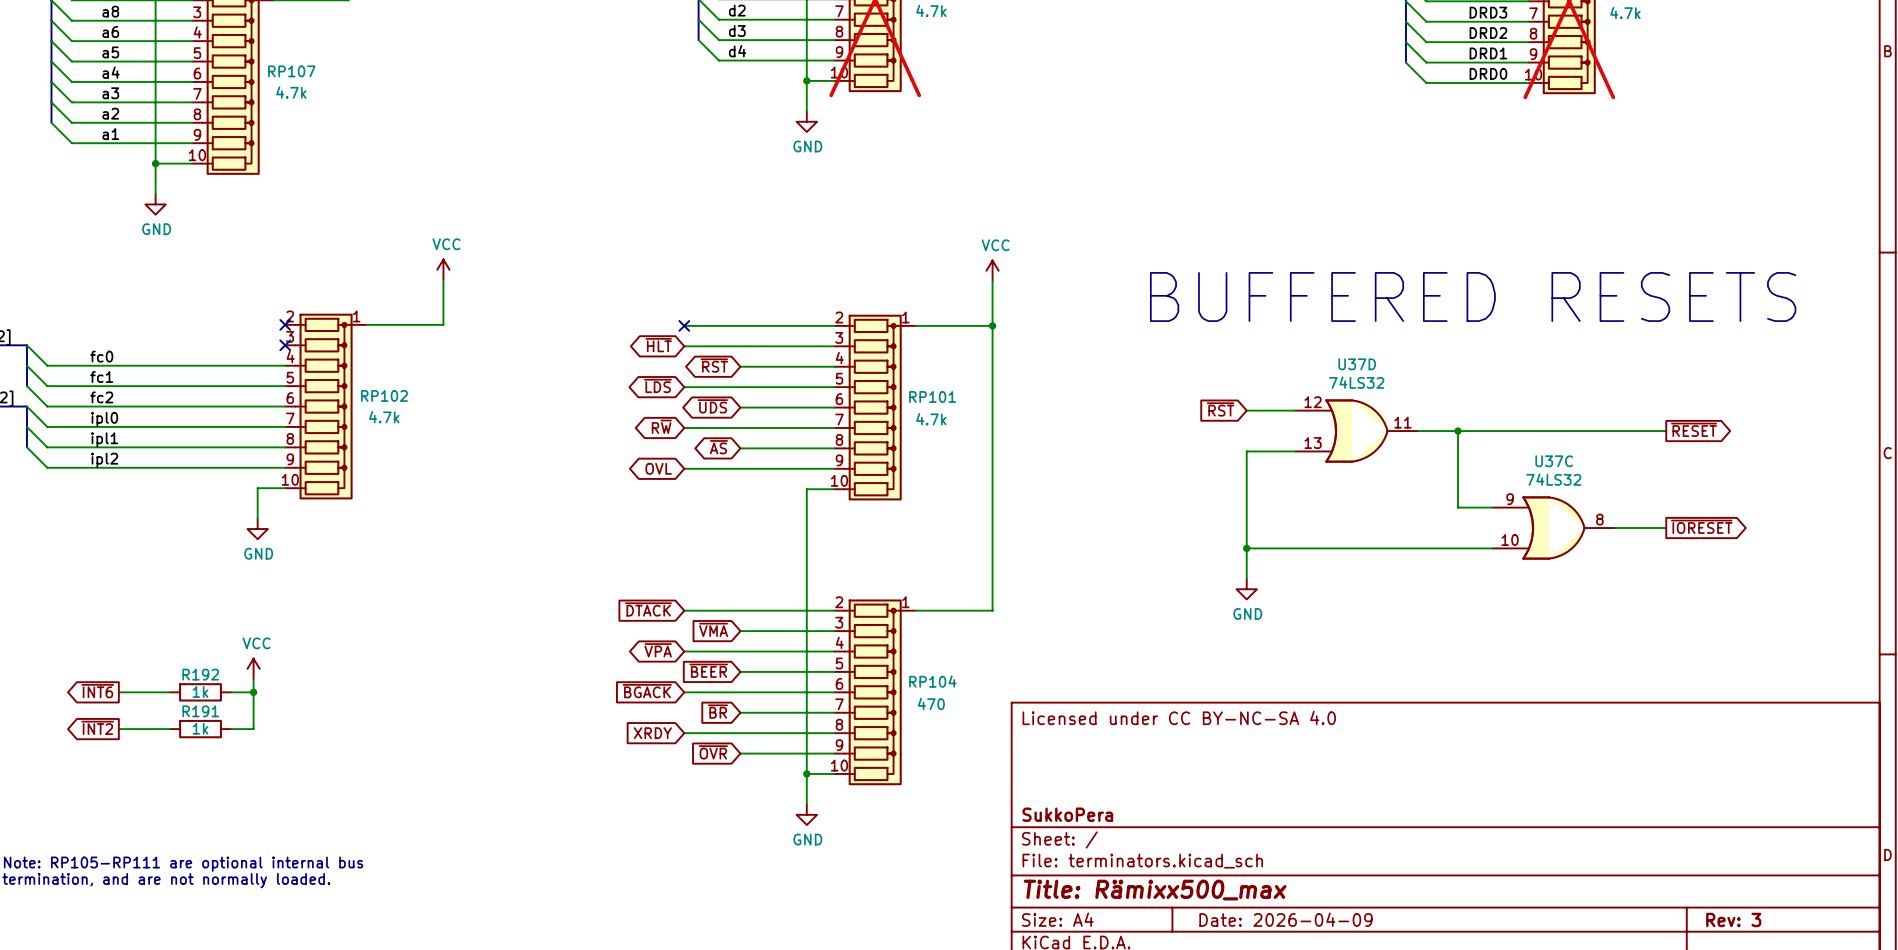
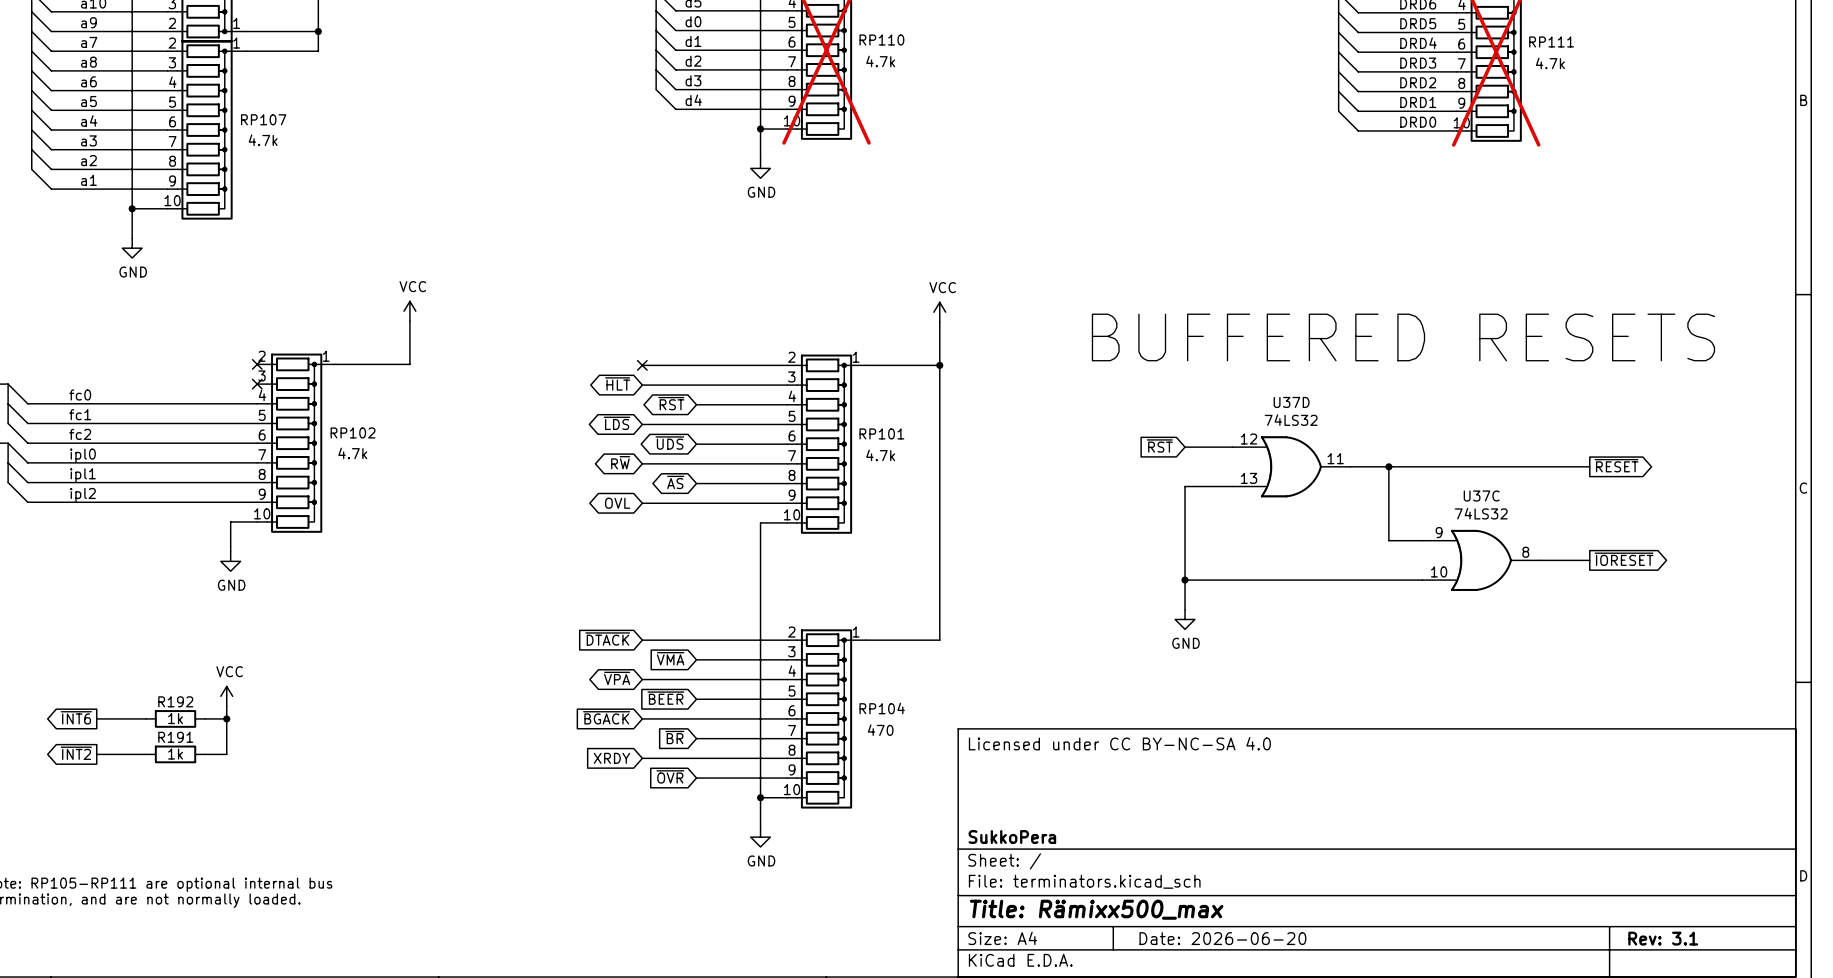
title block: Date: 2026-04-09 (1286, 919) -> Date: 2026-06-20 (1222, 938)
title block: Rev: 3 (1733, 919) -> Rev: 3.1 (1663, 938)

